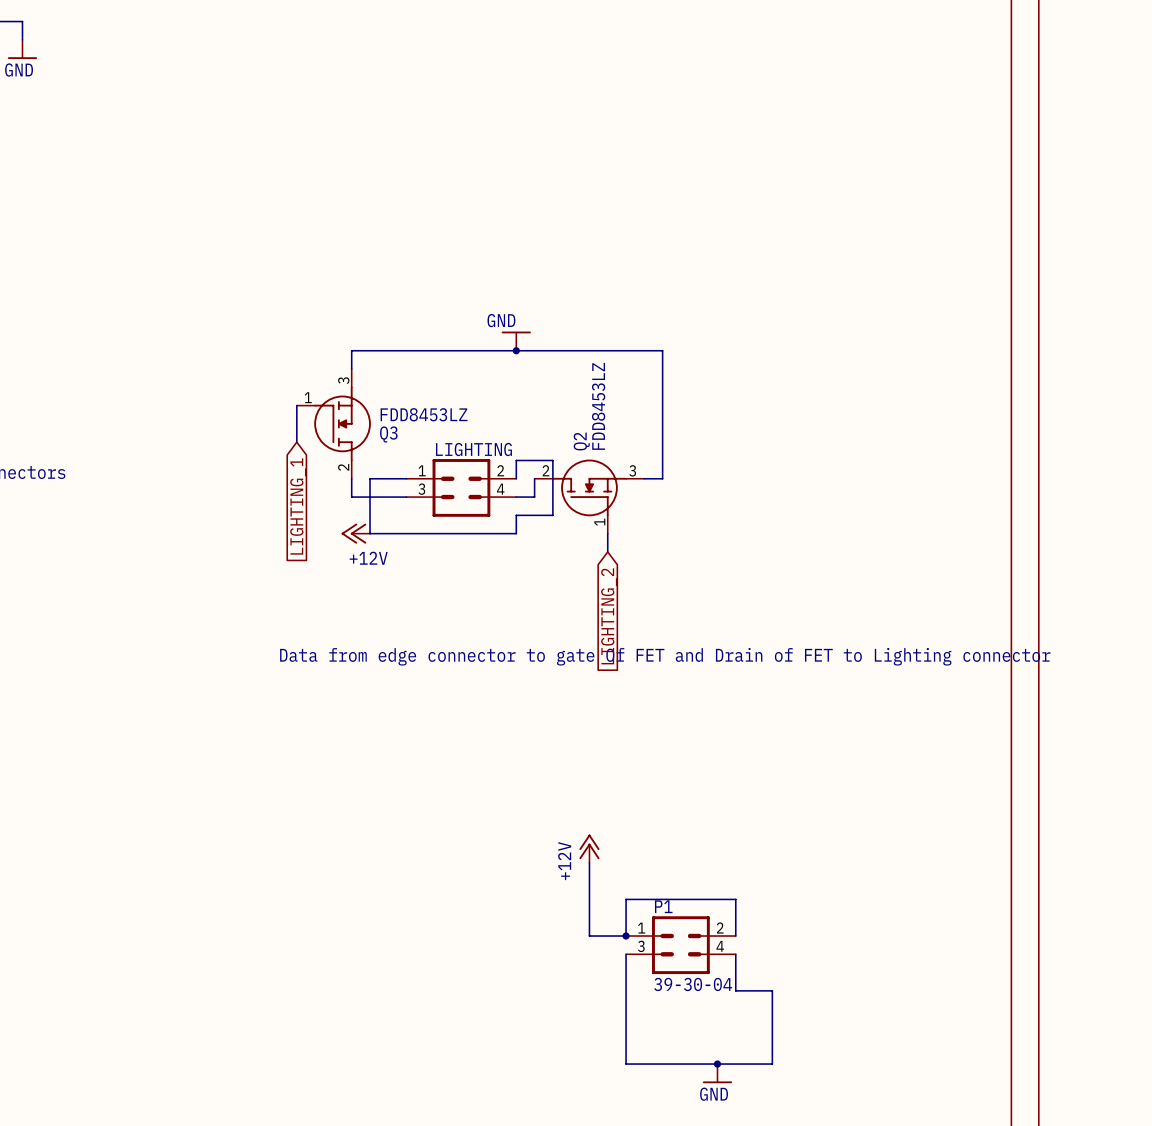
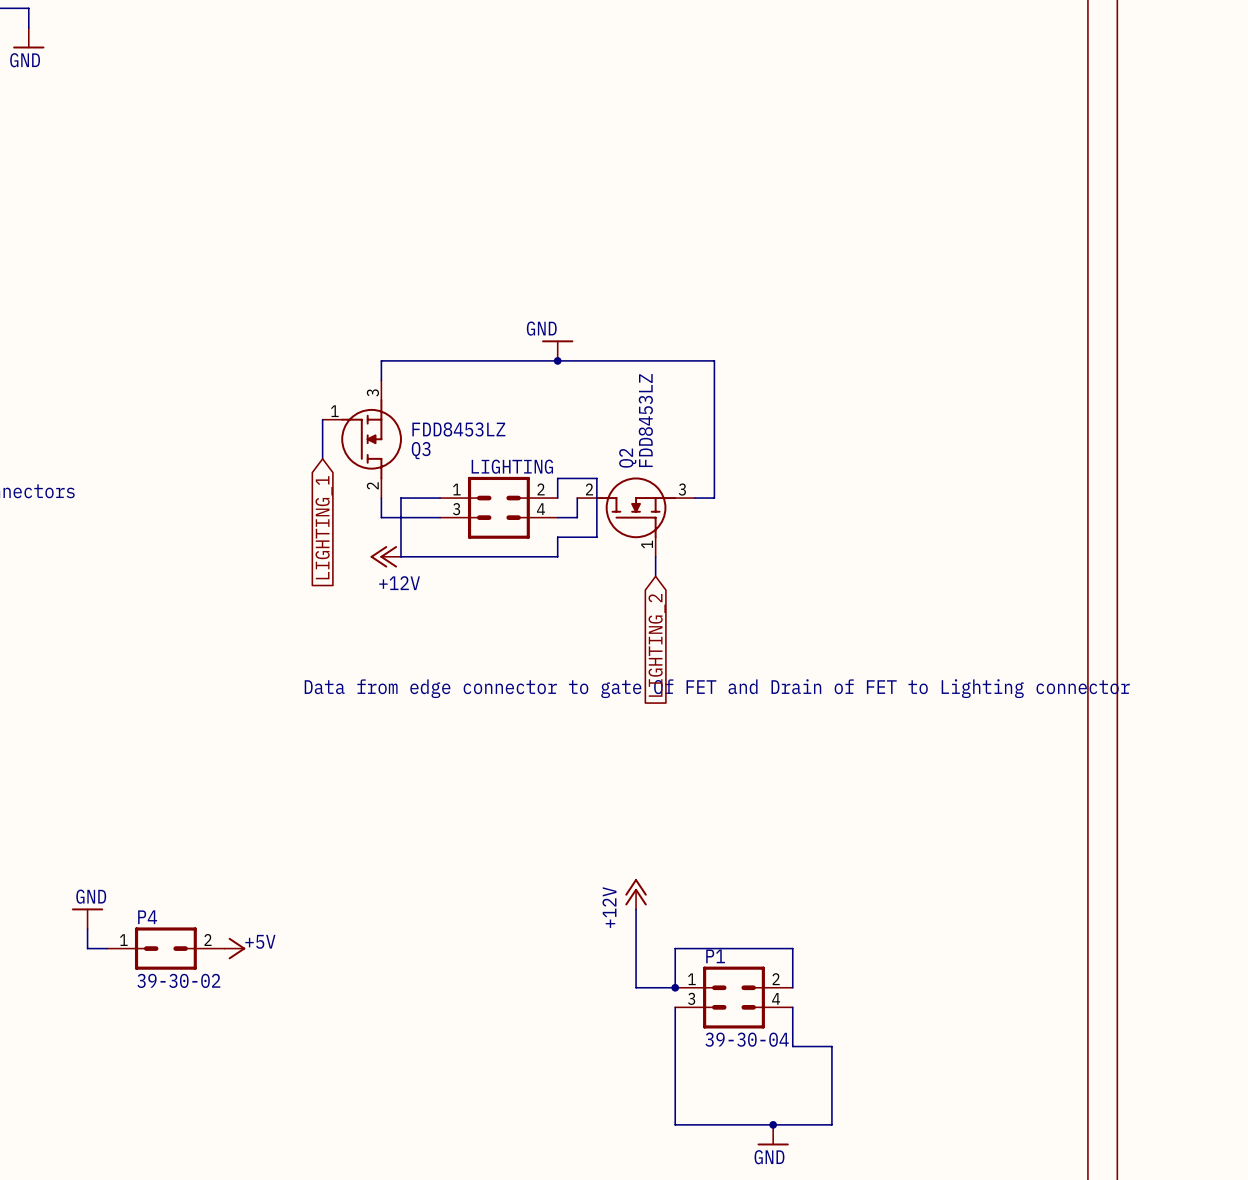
power symbol: none -> GND (87, 918)
wire: none -> (87, 928) (87, 948) (107, 948)
P4: none -> 39-30-02 (165, 948)
power symbol: none -> +5V (234, 948)

